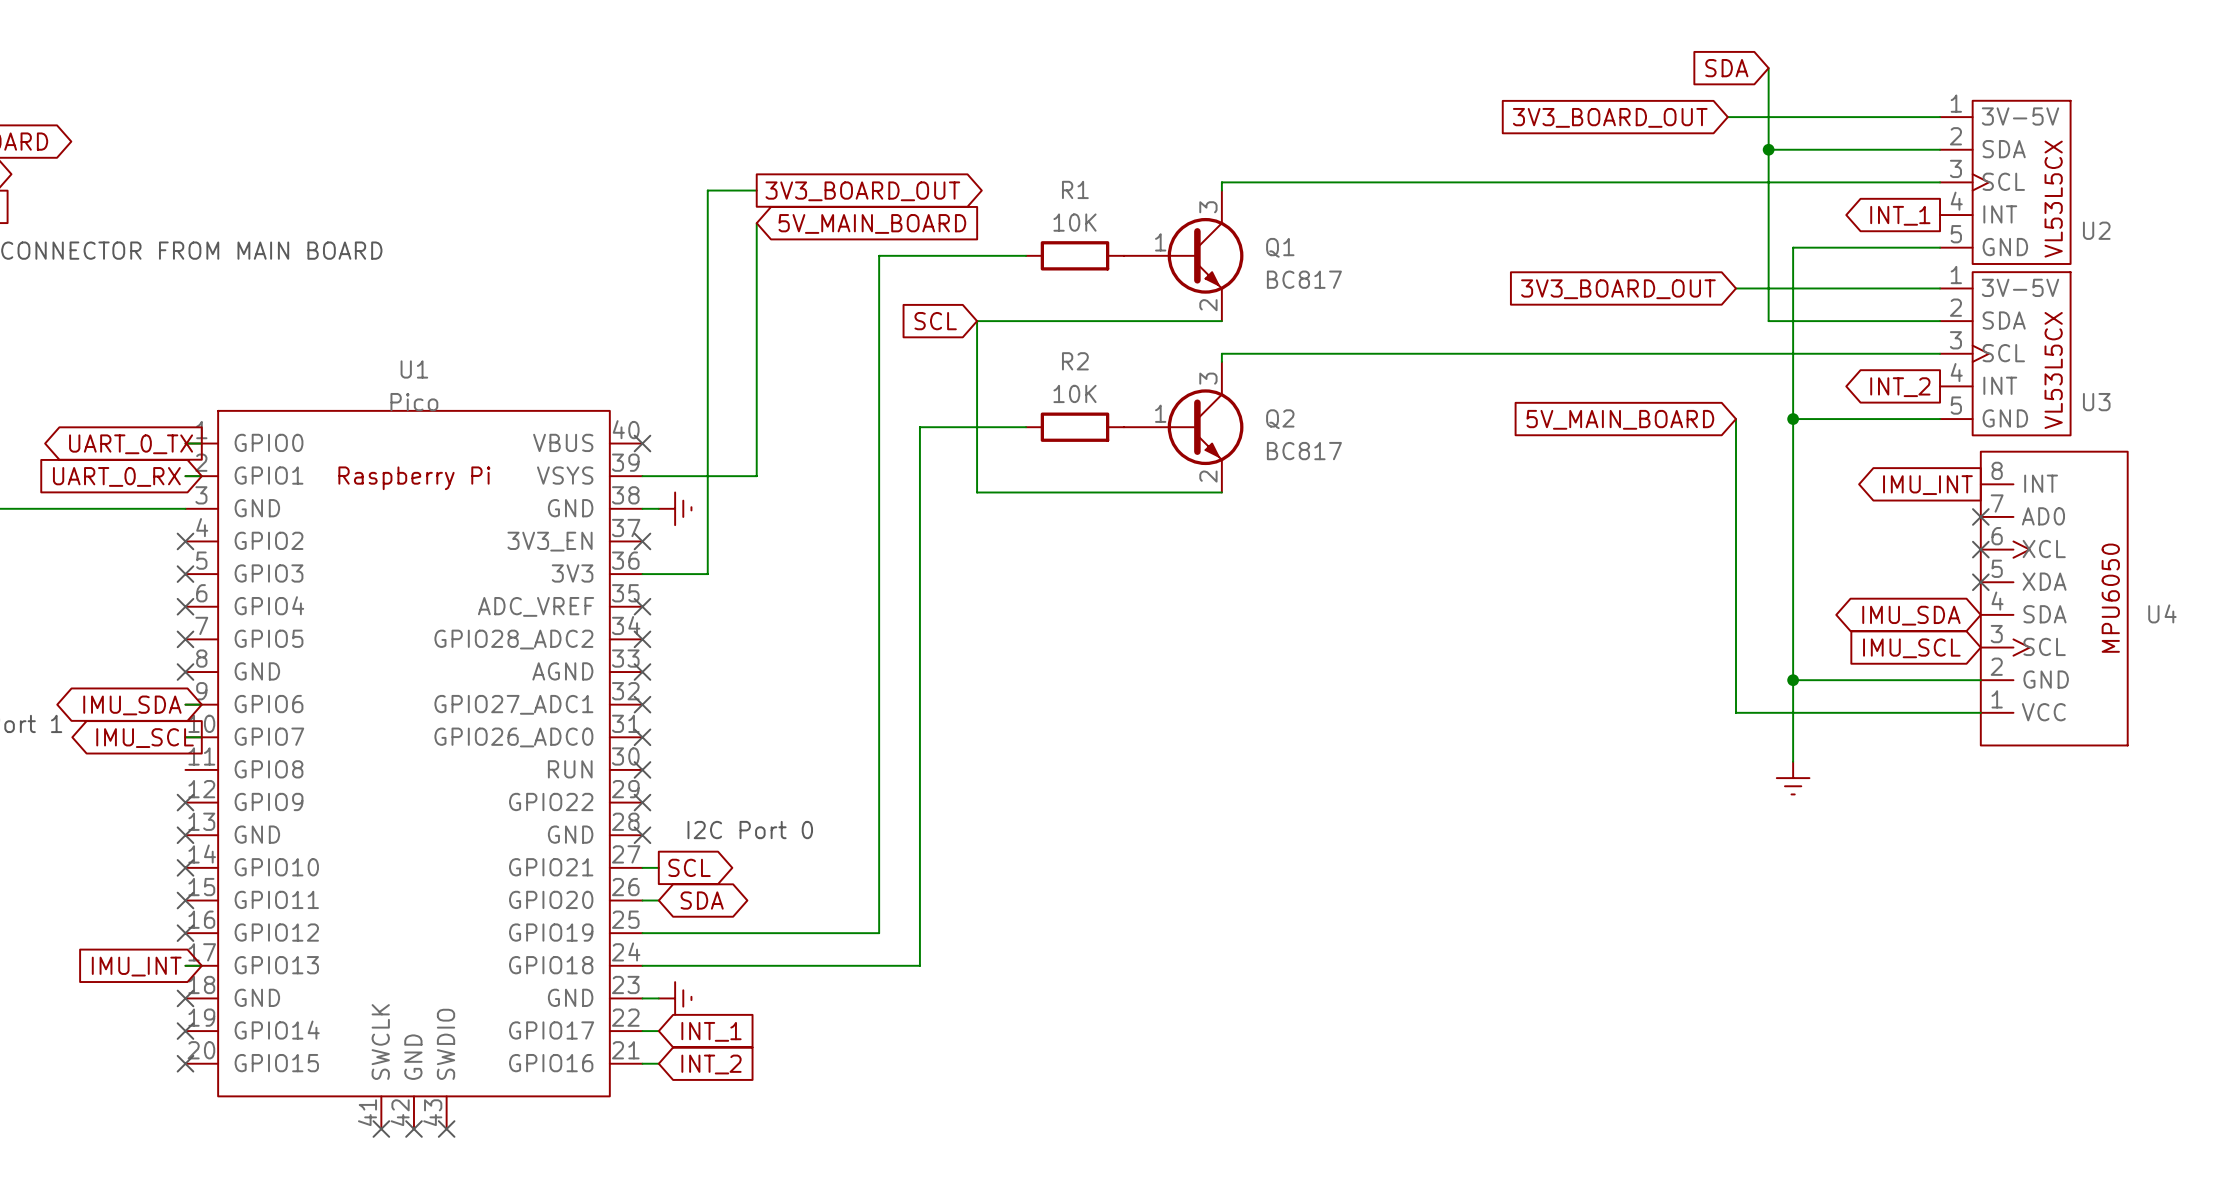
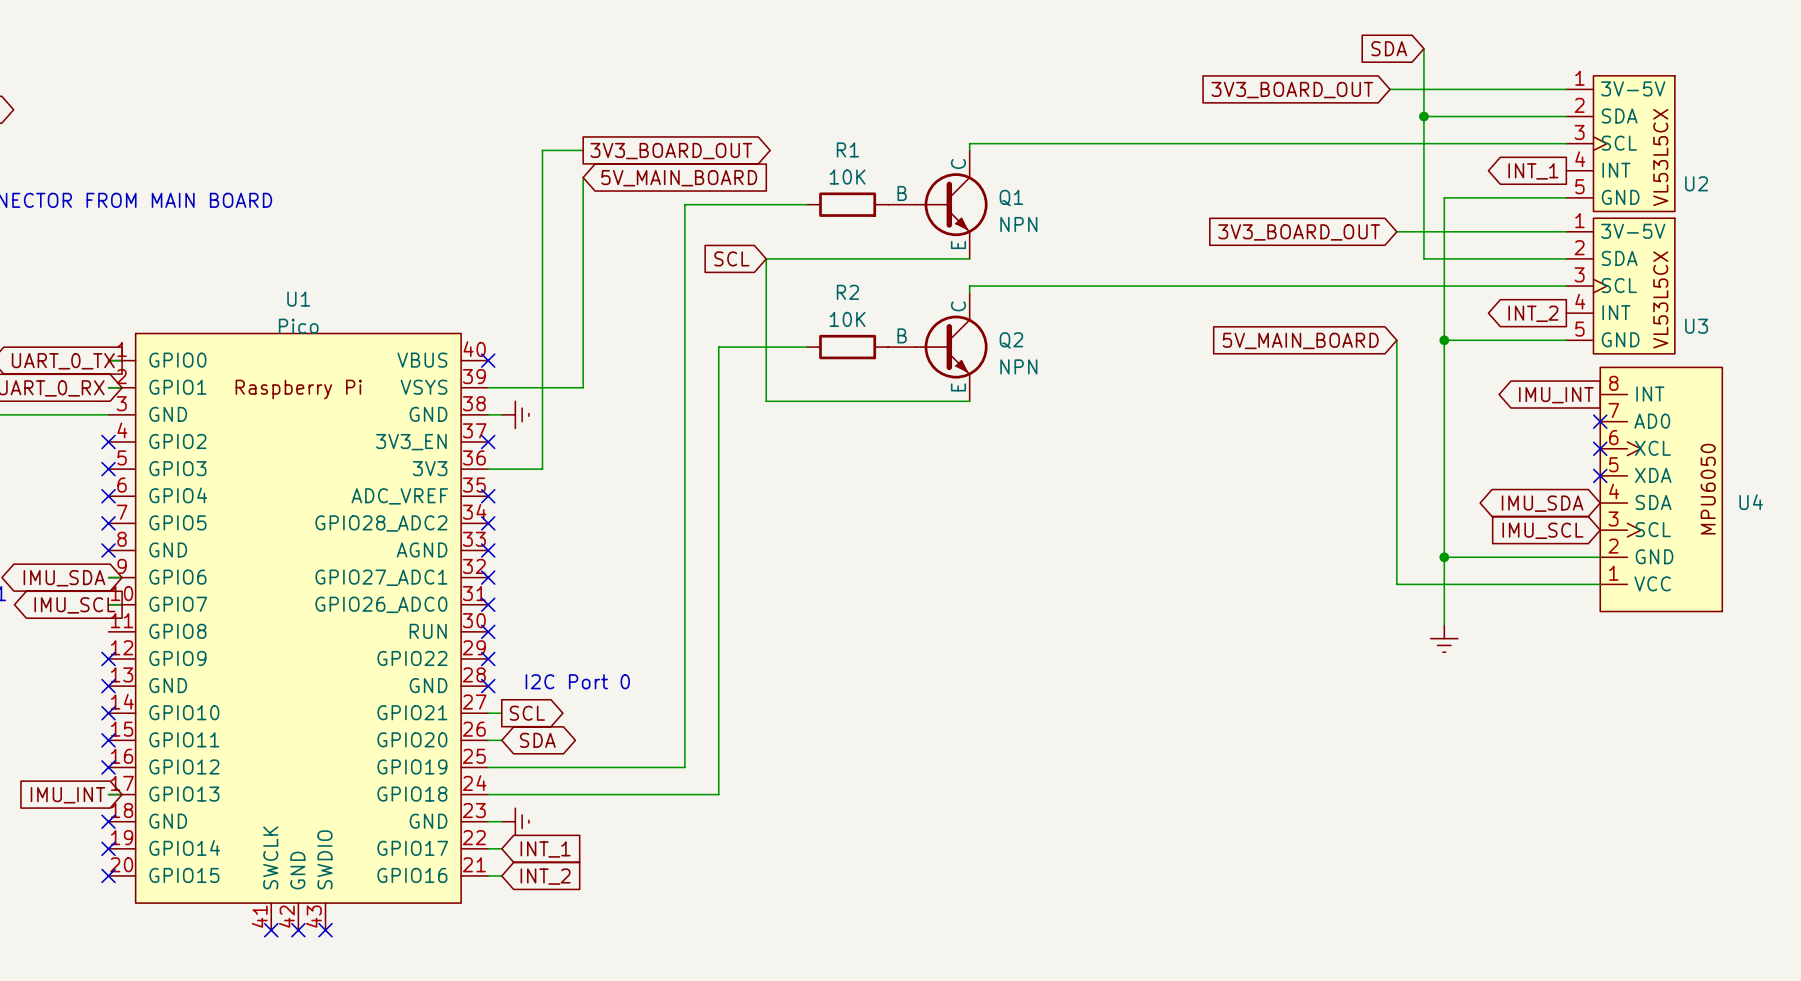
Q1 symbol: [1123, 190, 1244, 322] -> [888, 150, 988, 259]
Q1 value: BC817 (1304, 279) -> NPN (1018, 224)
Q2 symbol: [1123, 361, 1244, 493] -> [888, 292, 988, 402]
Q2 value: BC817 (1304, 451) -> NPN (1018, 366)

